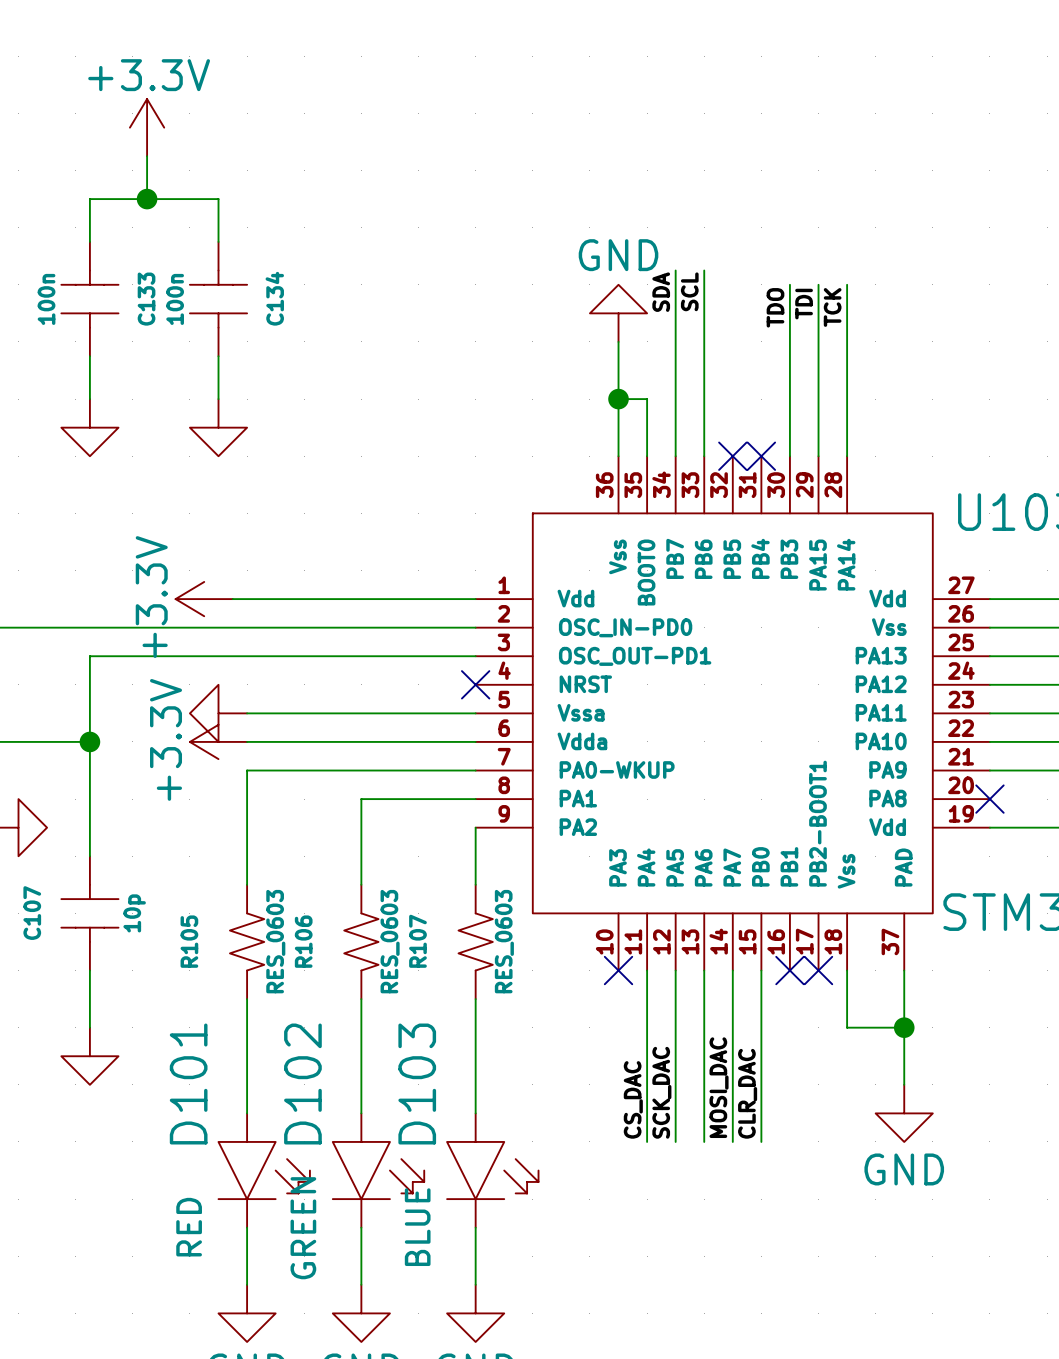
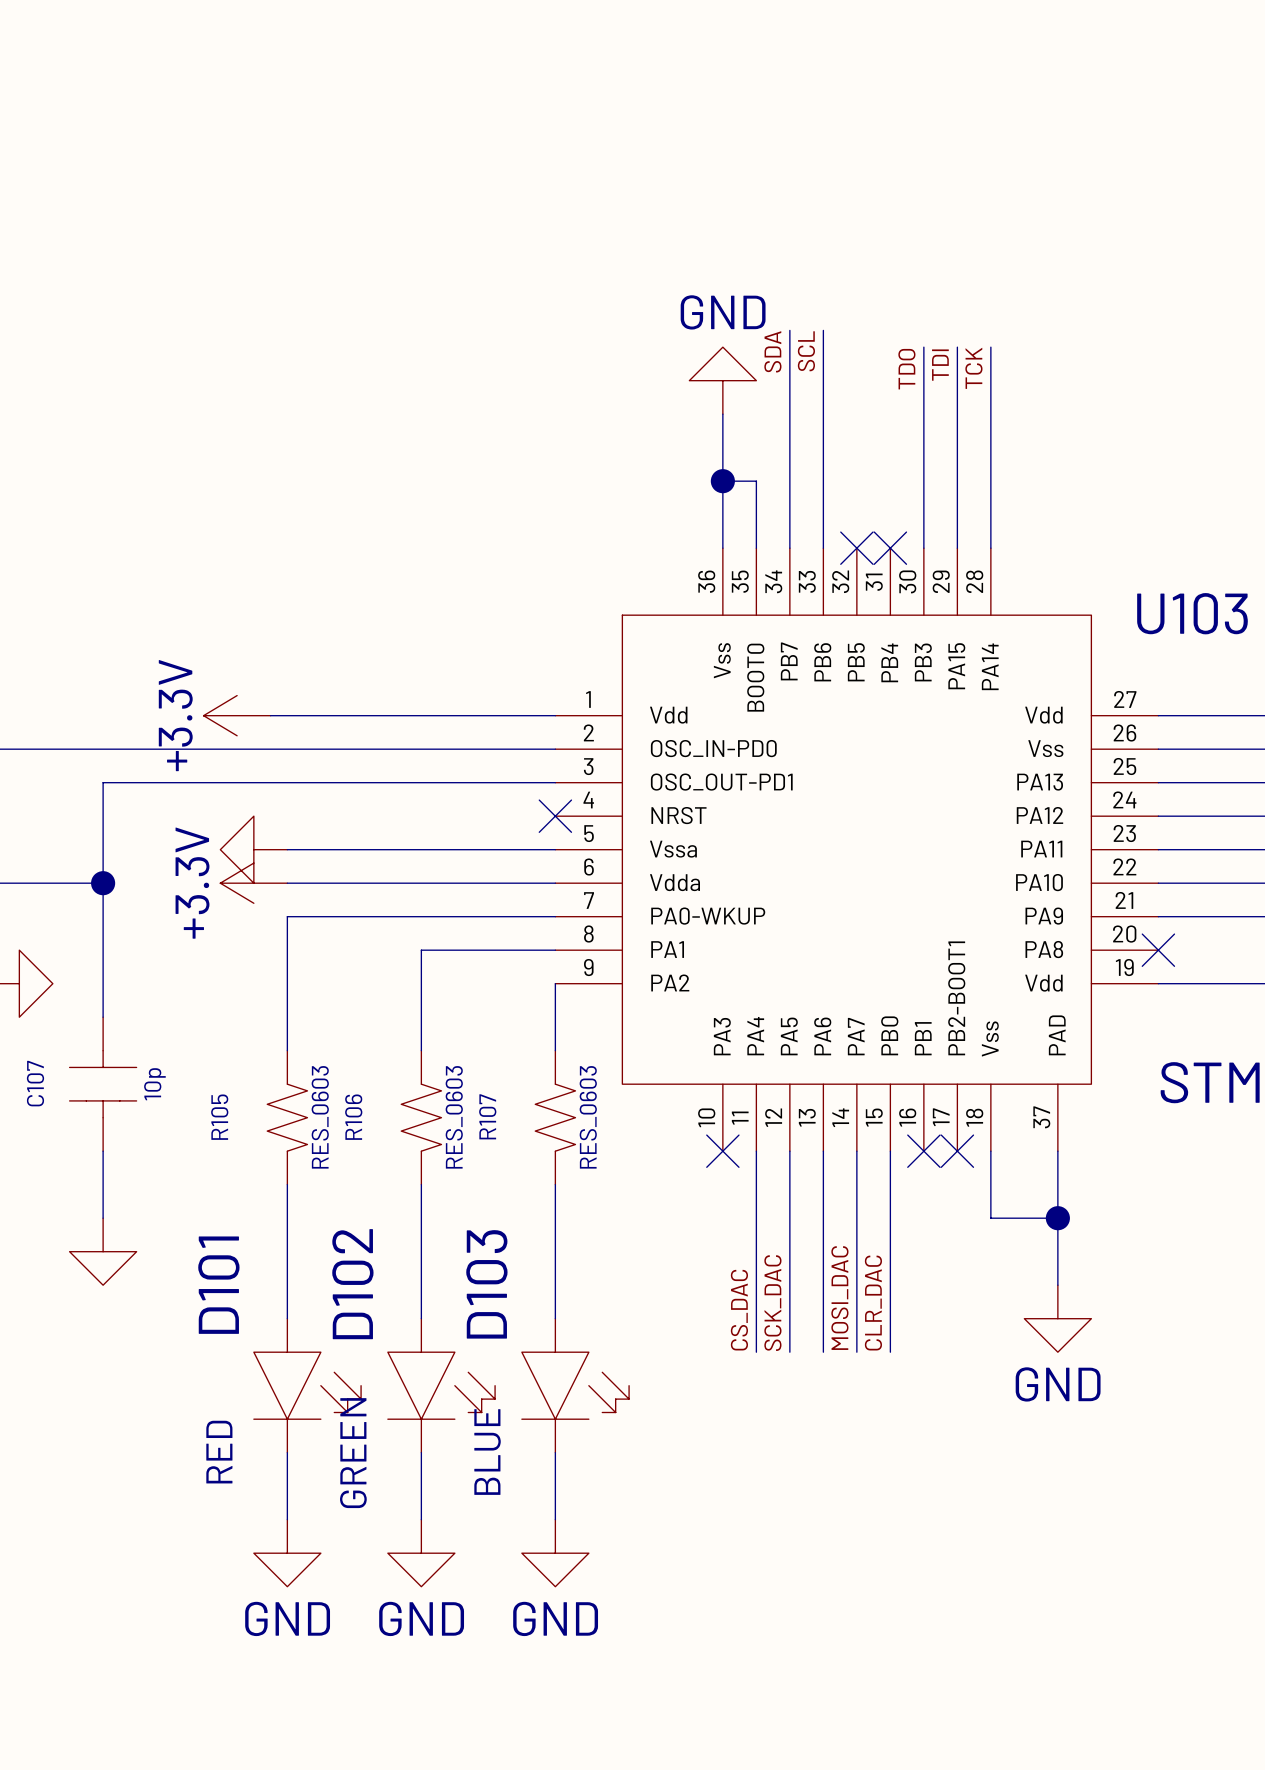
power symbol: +3.3V (147, 127) -> none
wire: (147, 156) (147, 199) -> none
junction: (147, 199) -> none
wire: (89, 241) (89, 199) (218, 199) (218, 241) -> none
C133: 100n (89, 299) -> none
C134: 100n (218, 299) -> none
wire: (89, 356) (89, 399) -> none
wire: (218, 356) (218, 399) -> none
power symbol: (89, 427) -> none
power symbol: (218, 427) -> none

